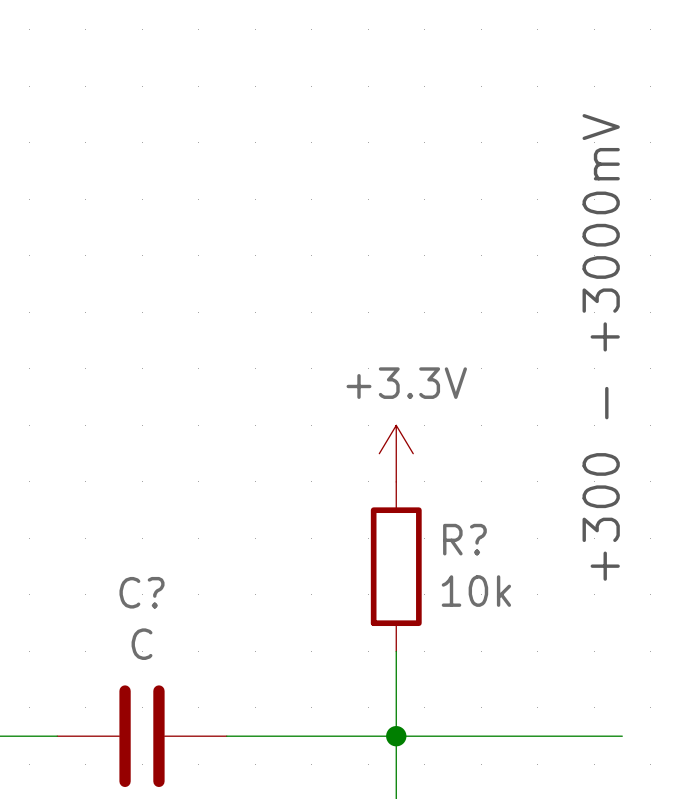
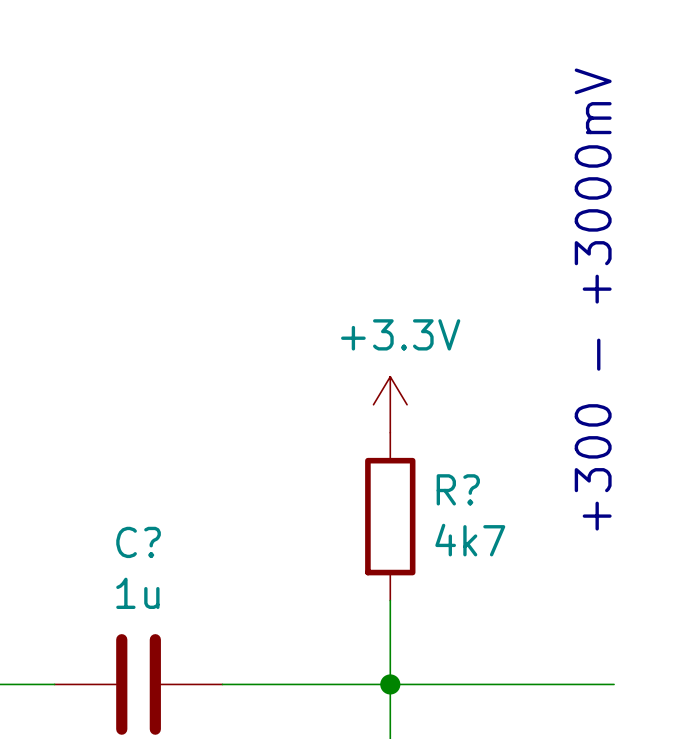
R? value: 10k (476, 591) -> 4k7 (470, 540)
C? value: C (142, 644) -> 1u (137, 593)

